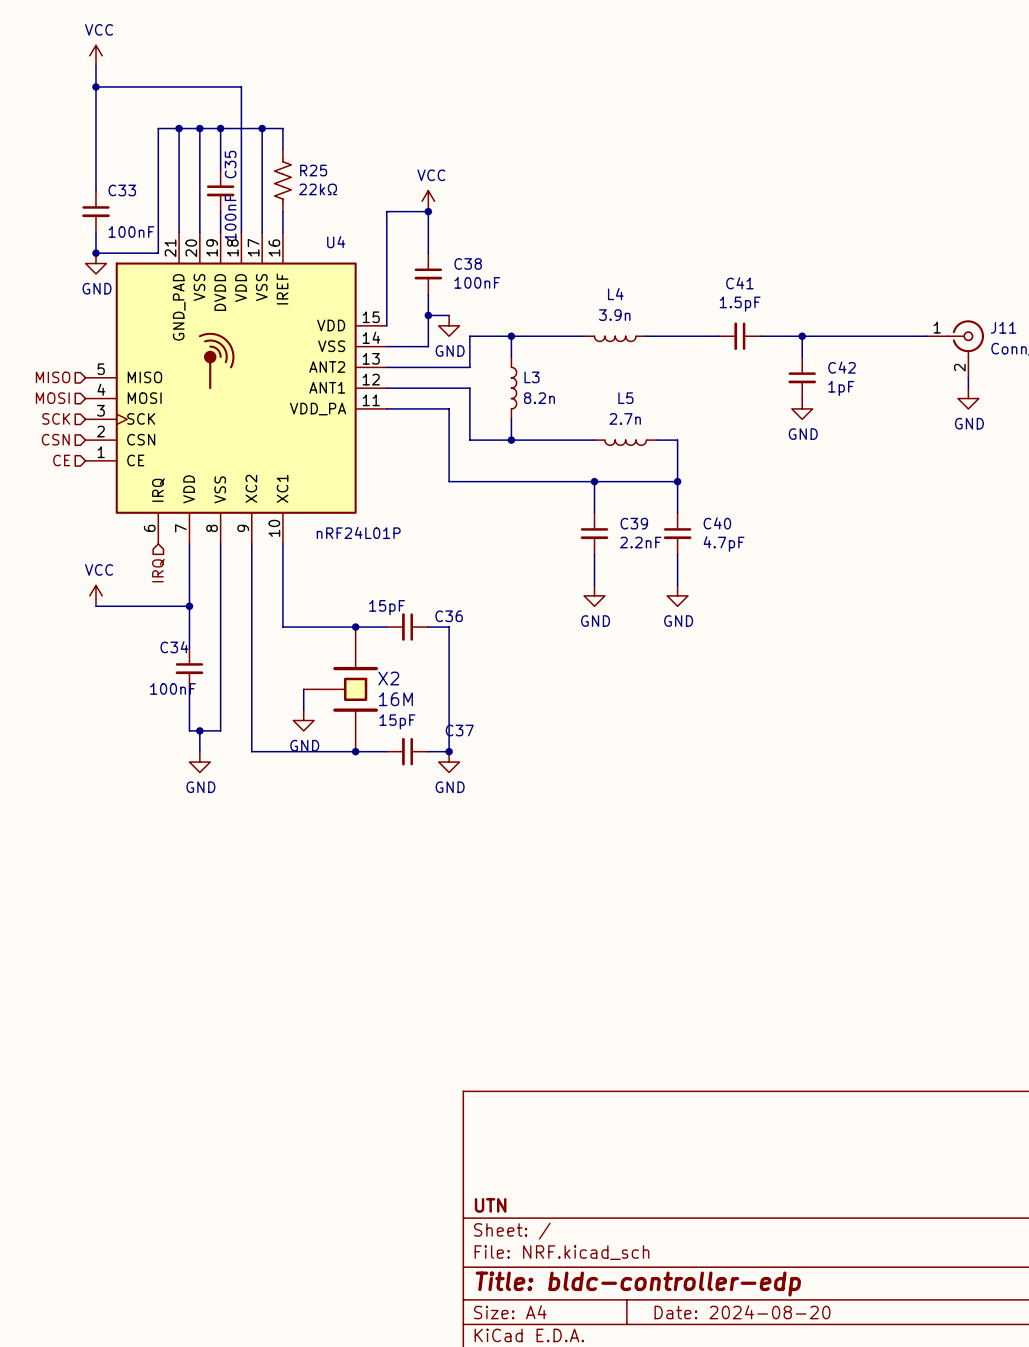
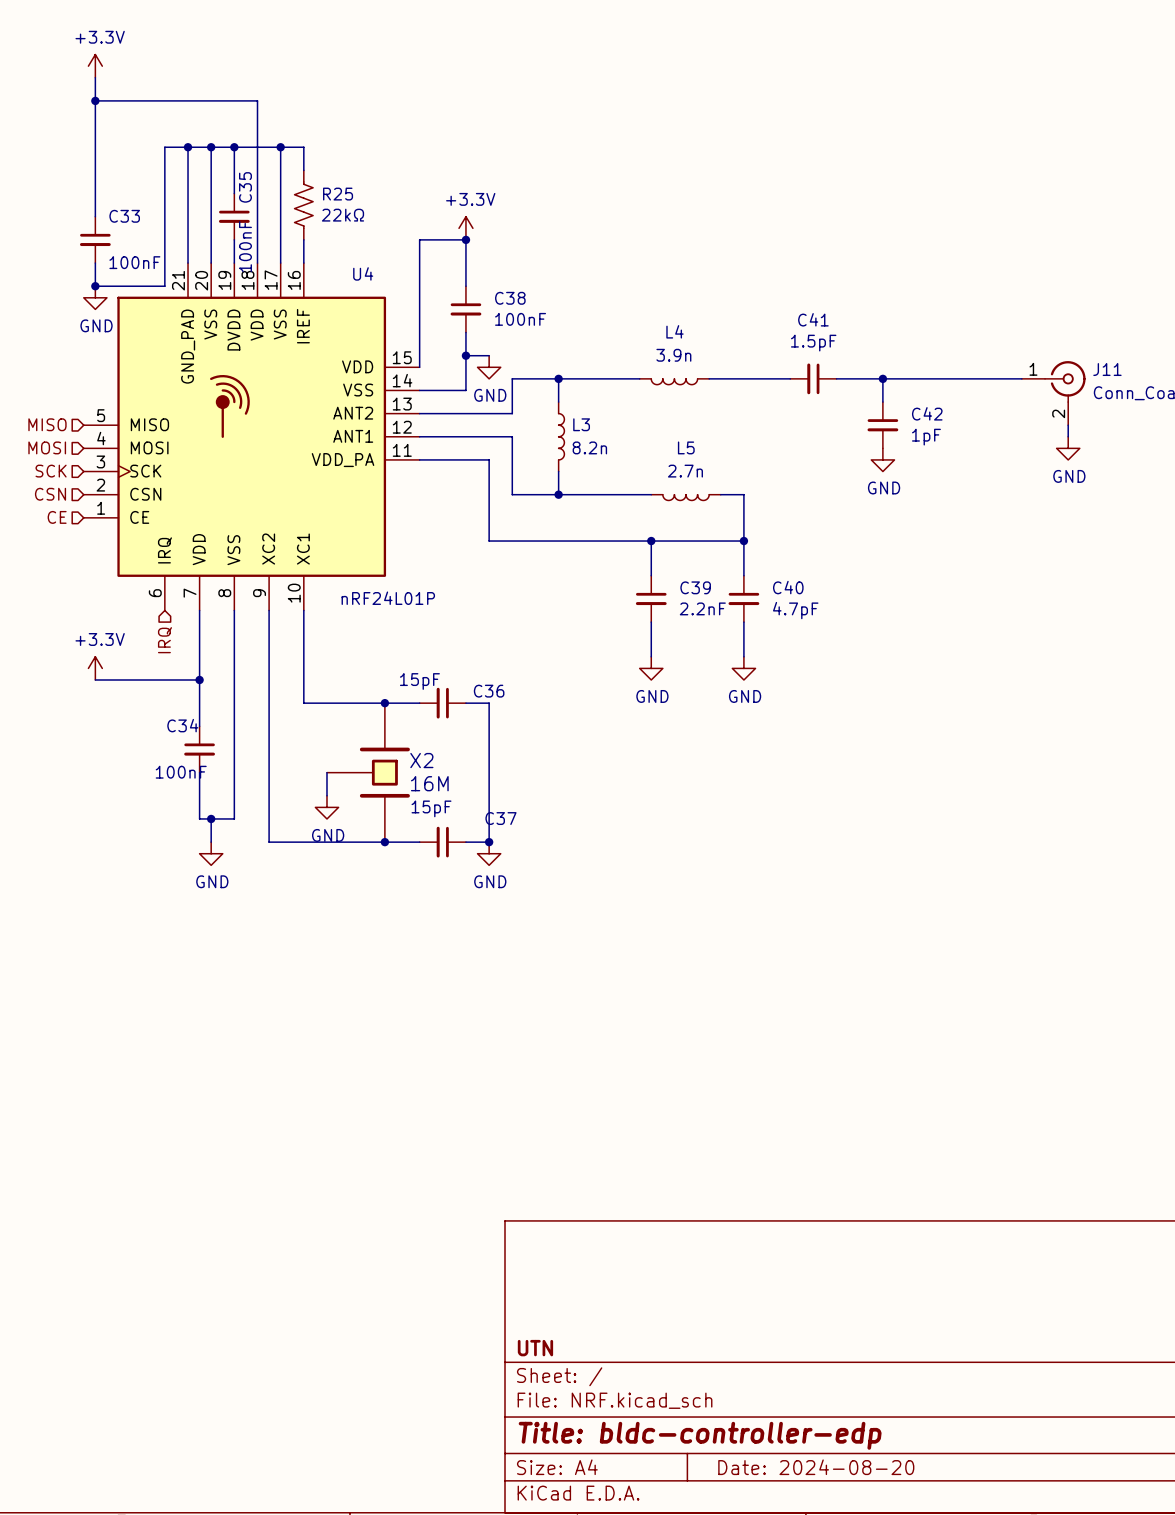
power symbol: VCC (95, 55) -> +3.3V (95, 66)
power symbol: VCC (428, 201) -> +3.3V (465, 228)
power symbol: VCC (95, 595) -> +3.3V (95, 668)

